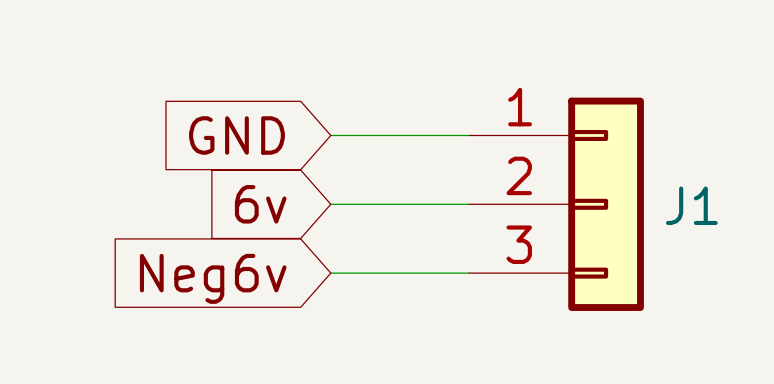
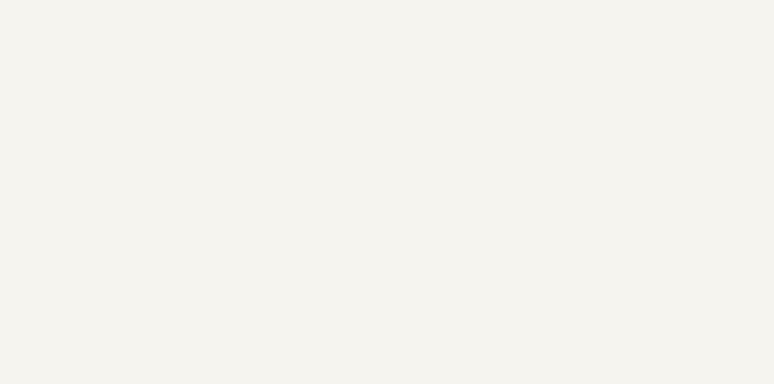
global label: GND (236, 135) -> none
wire: (330, 135) (468, 135) -> none
global label: 6v (260, 204) -> none
wire: (330, 204) (468, 204) -> none
J1: (556, 204) -> none
wire: (330, 273) (468, 273) -> none
global label: Neg6v (213, 278) -> none

